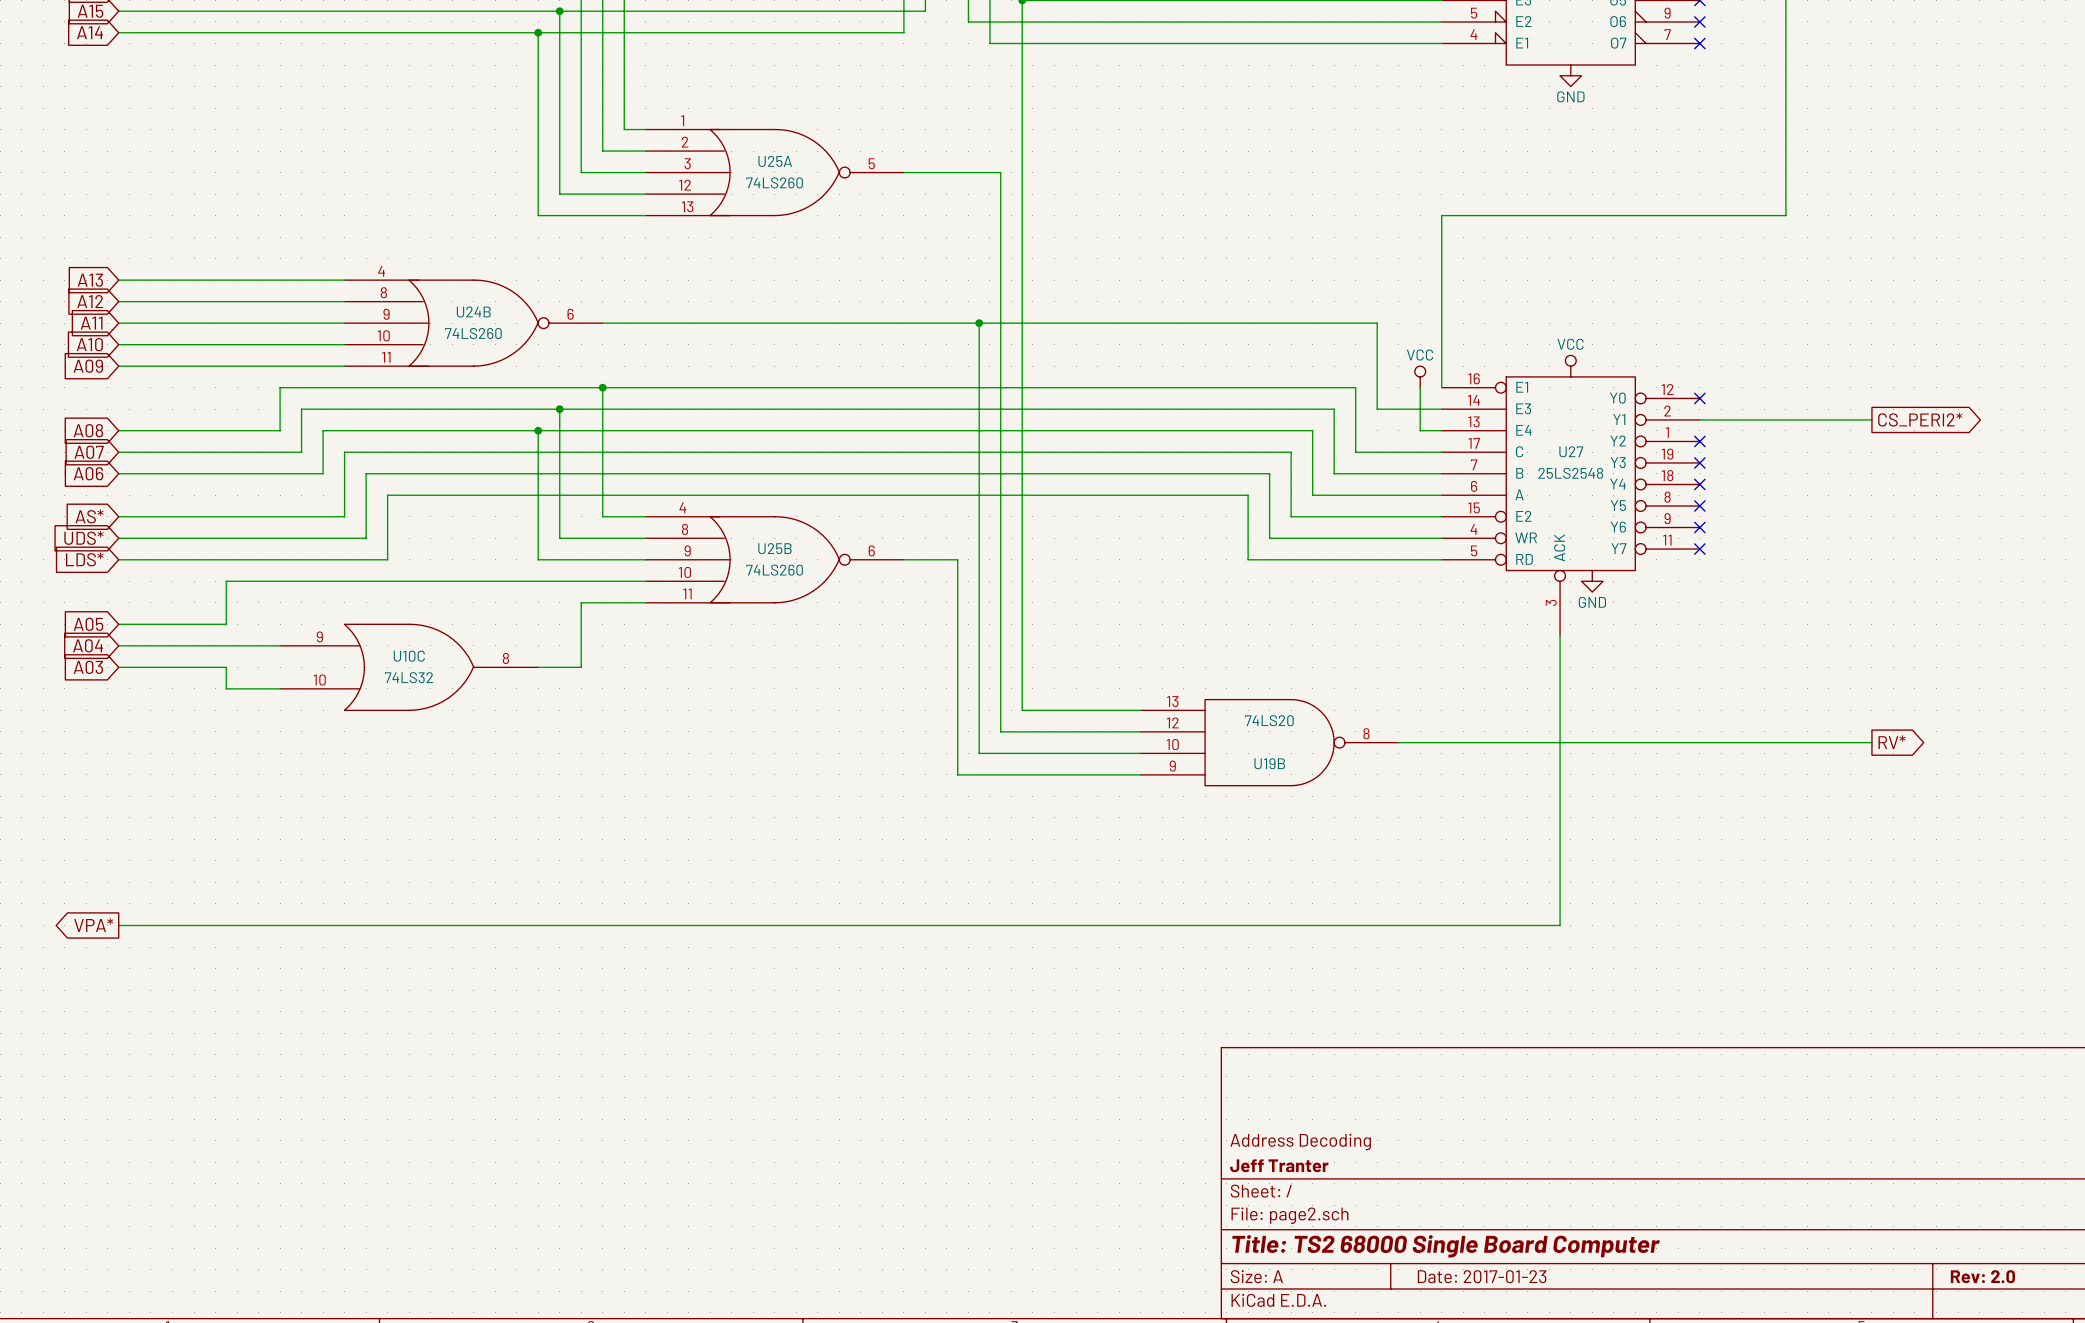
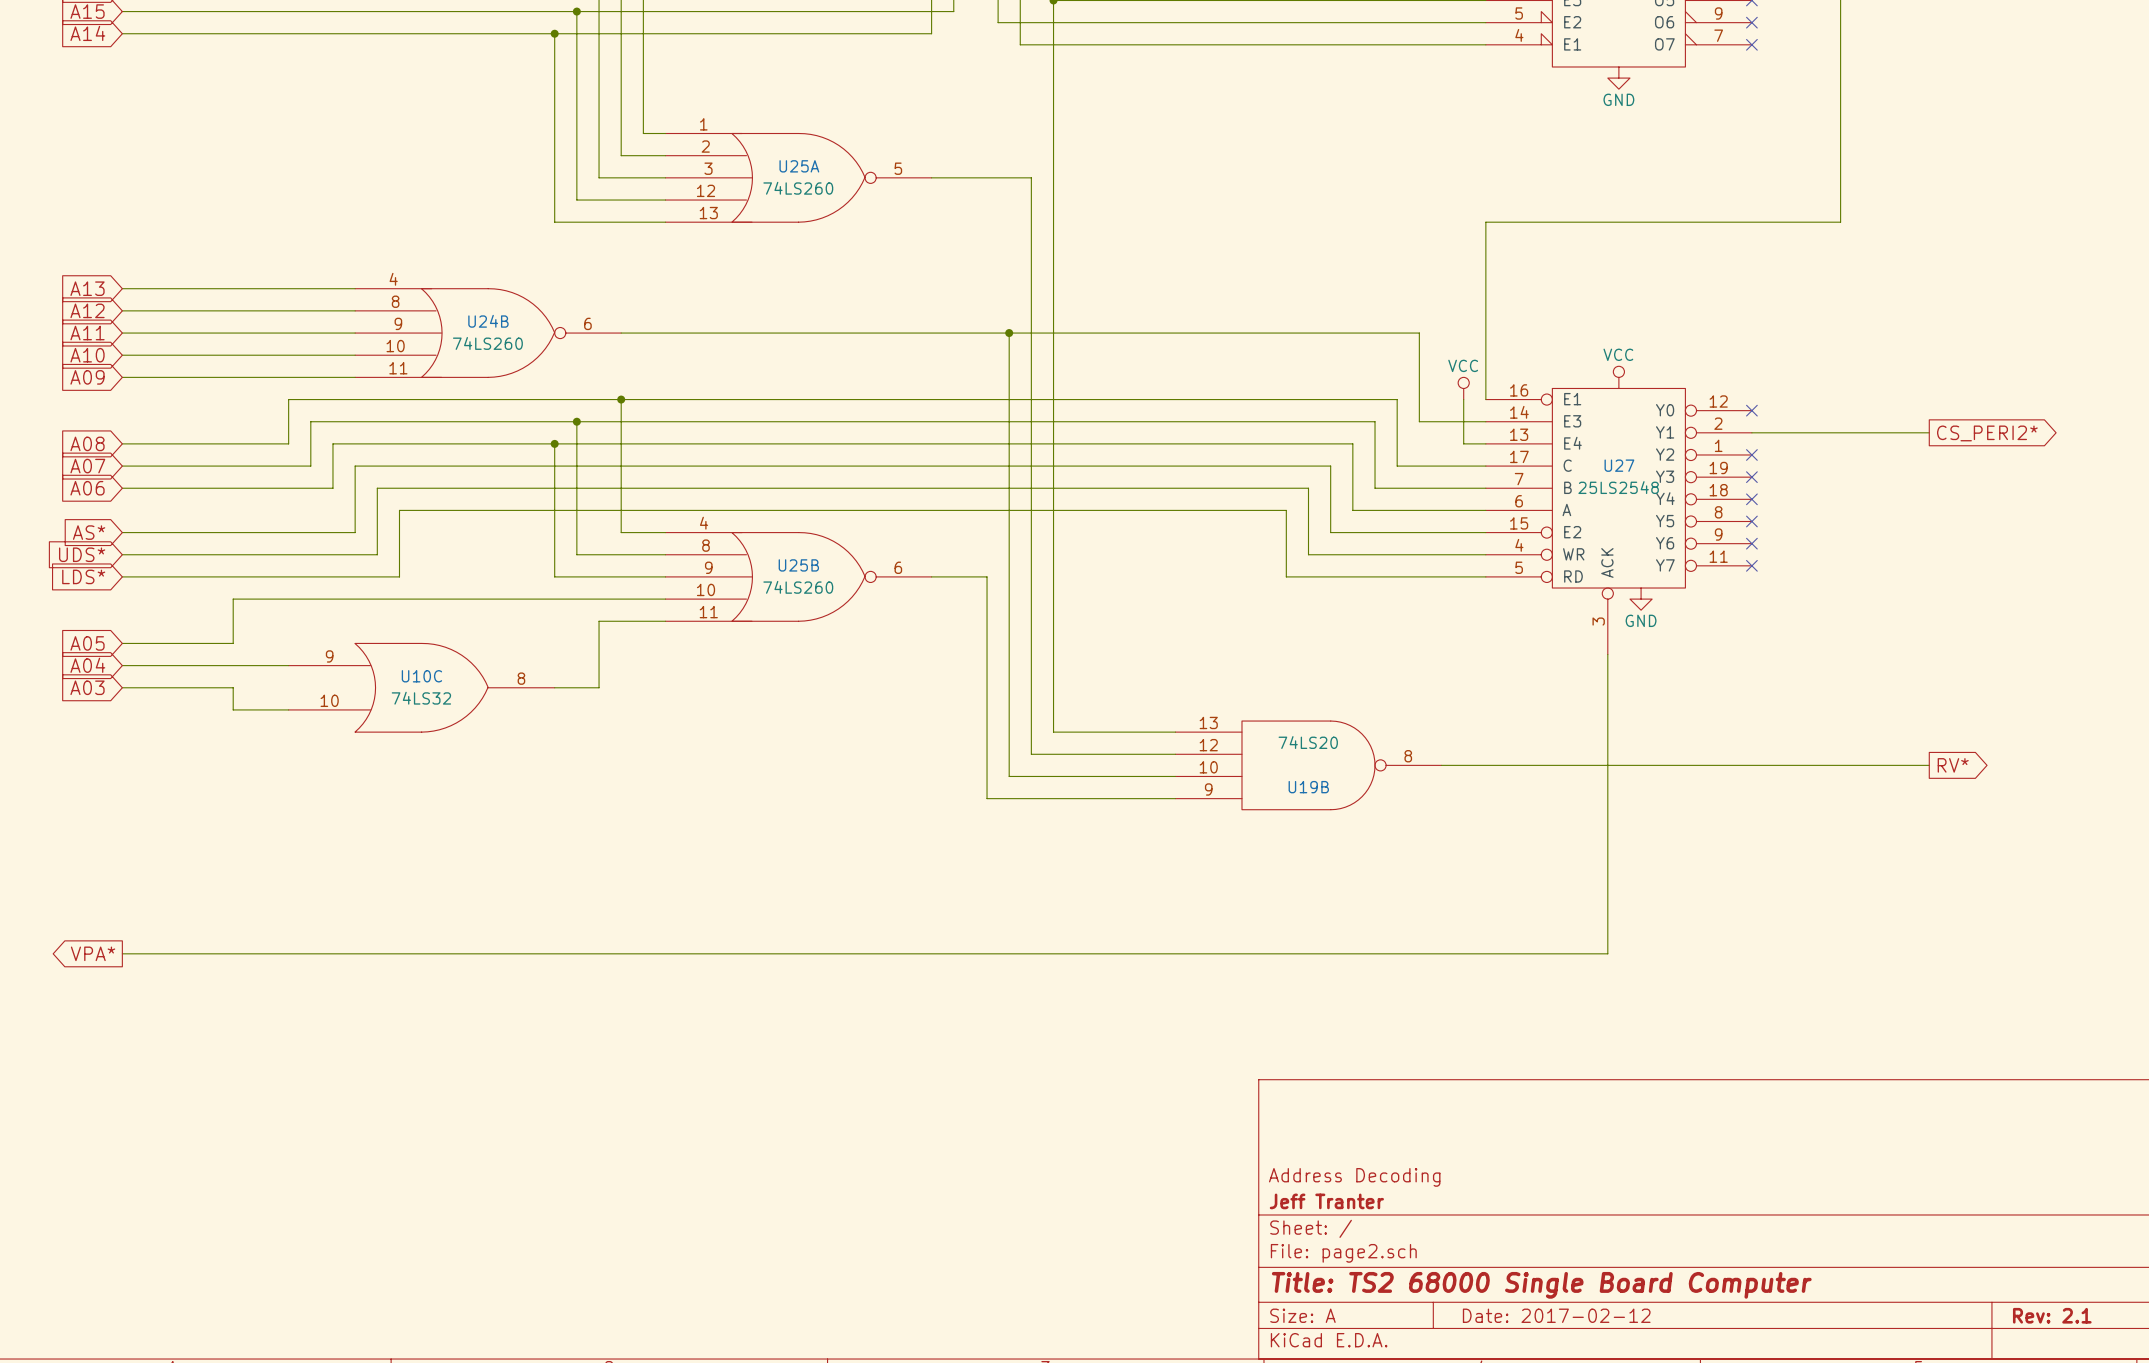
title block: Date: 2017-01-23 (1482, 1276) -> Date: 2017-02-12 (1556, 1315)
title block: Rev: 2.0 (1982, 1276) -> Rev: 2.1 (2052, 1315)

